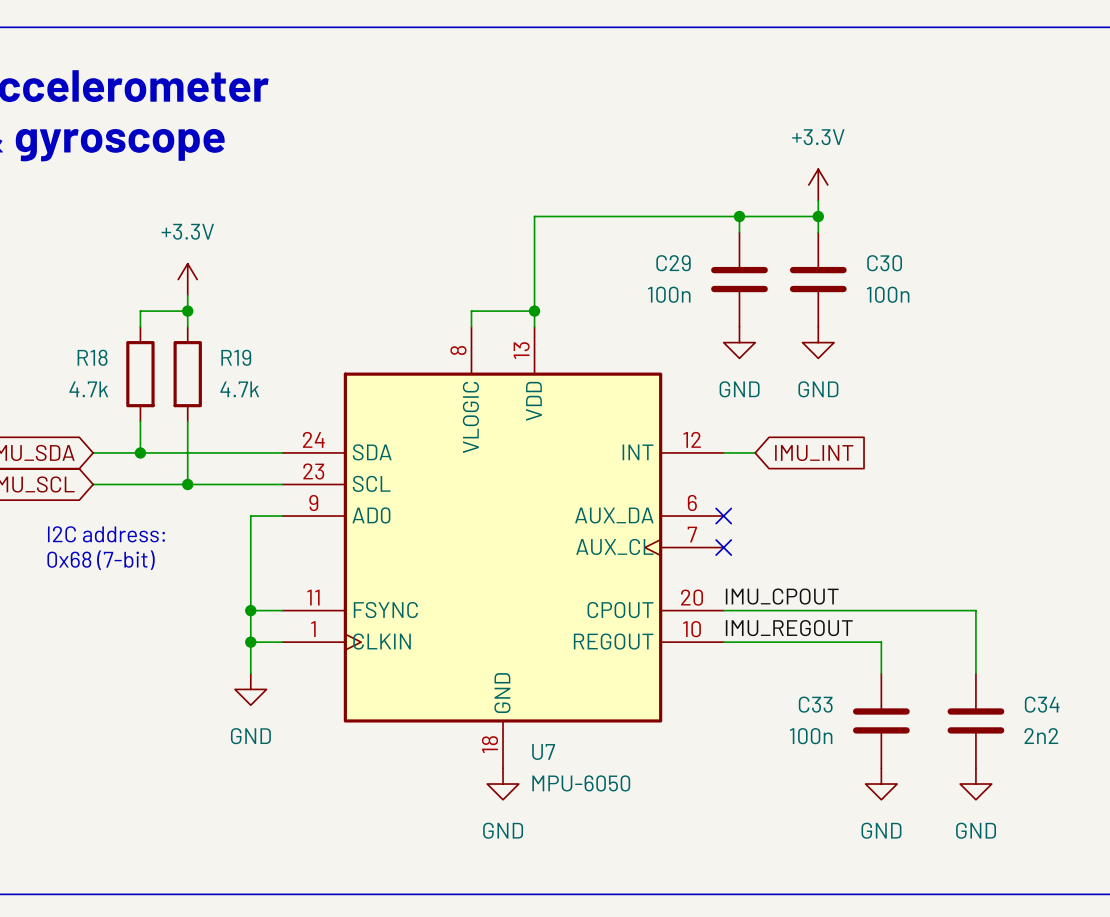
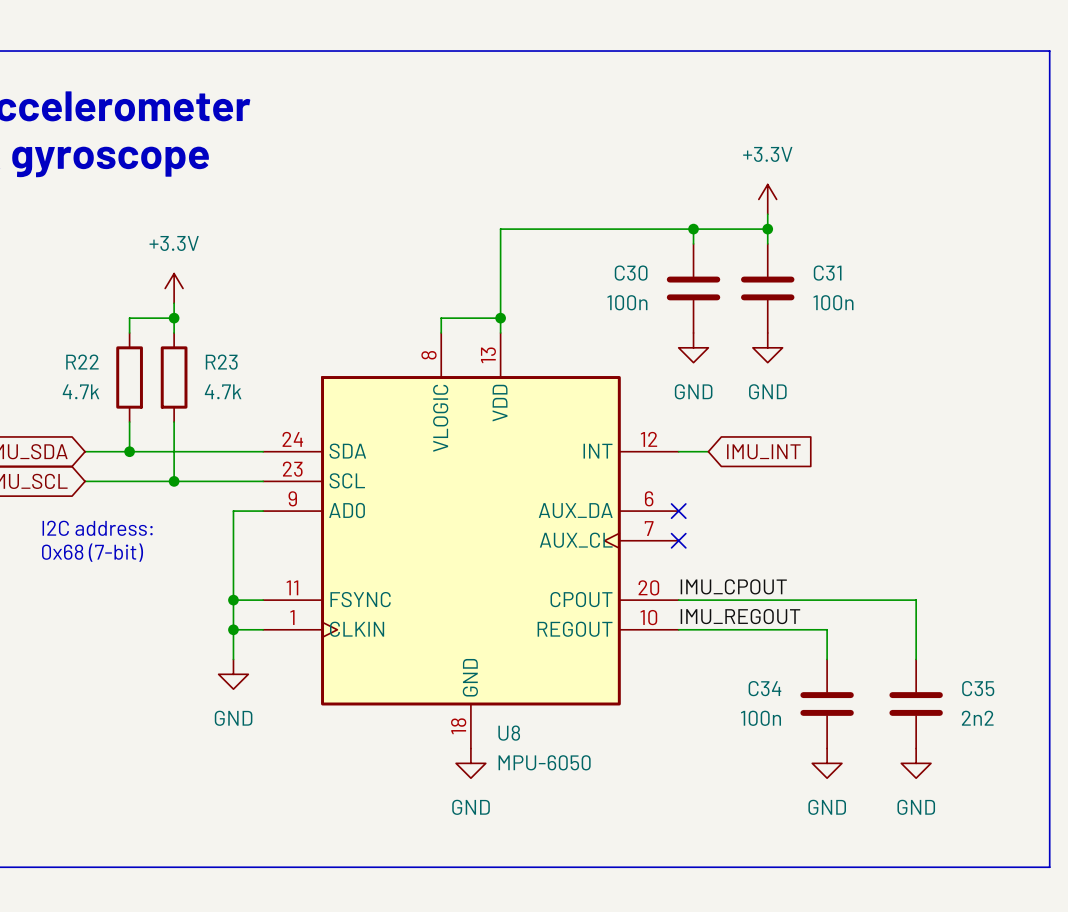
C29 name: C29 (673, 263) -> C30 (631, 273)
C30 name: C30 (884, 263) -> C31 (827, 273)
R18 name: R18 (92, 357) -> R22 (82, 362)
R19 name: R19 (236, 357) -> R23 (221, 362)
C33 name: C33 (815, 704) -> C34 (764, 688)
C34 name: C34 (1042, 704) -> C35 (978, 688)
U7 name: U7 (543, 751) -> U8 (509, 733)

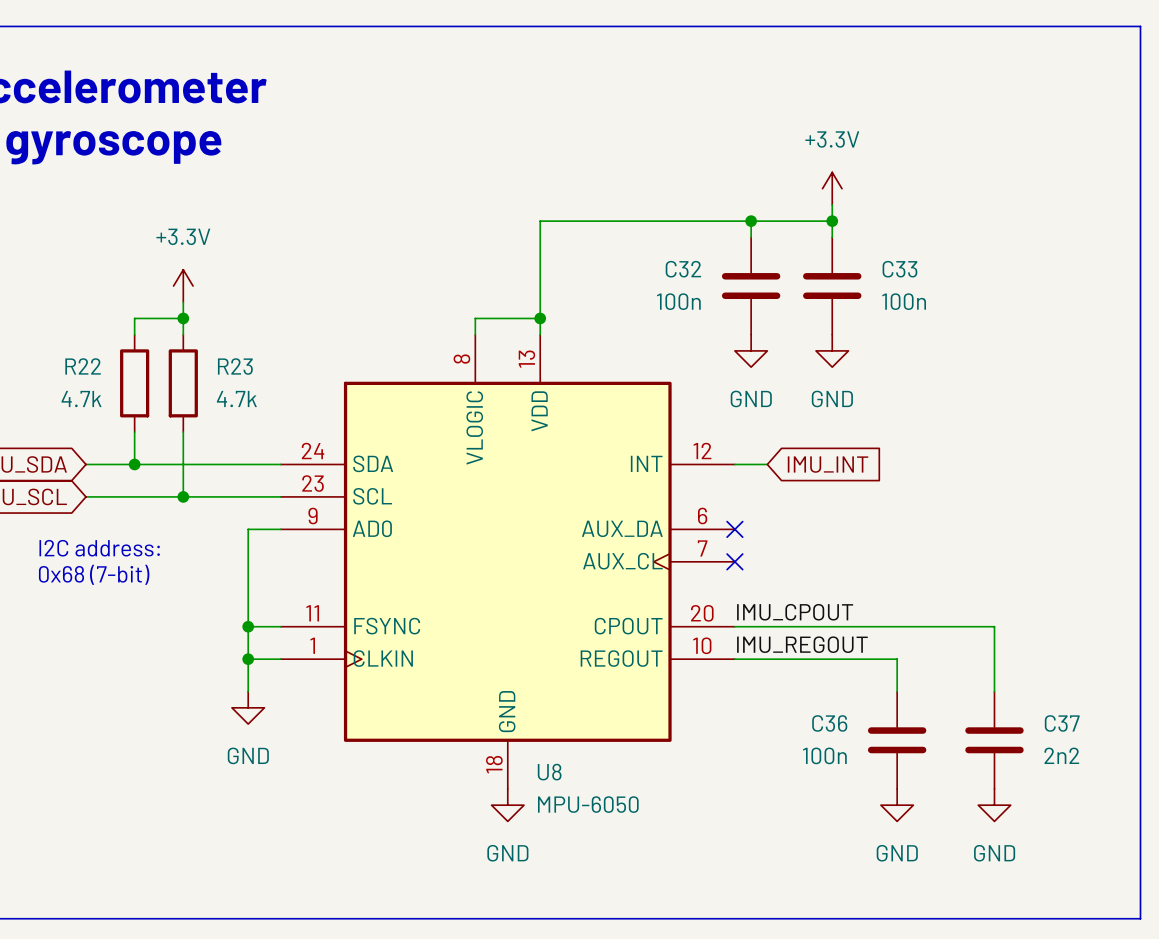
C30 name: C30 (631, 273) -> C32 (683, 269)
C31 name: C31 (827, 273) -> C33 (899, 269)
C34 name: C34 (764, 688) -> C36 (829, 723)
C35 name: C35 (978, 688) -> C37 (1062, 723)

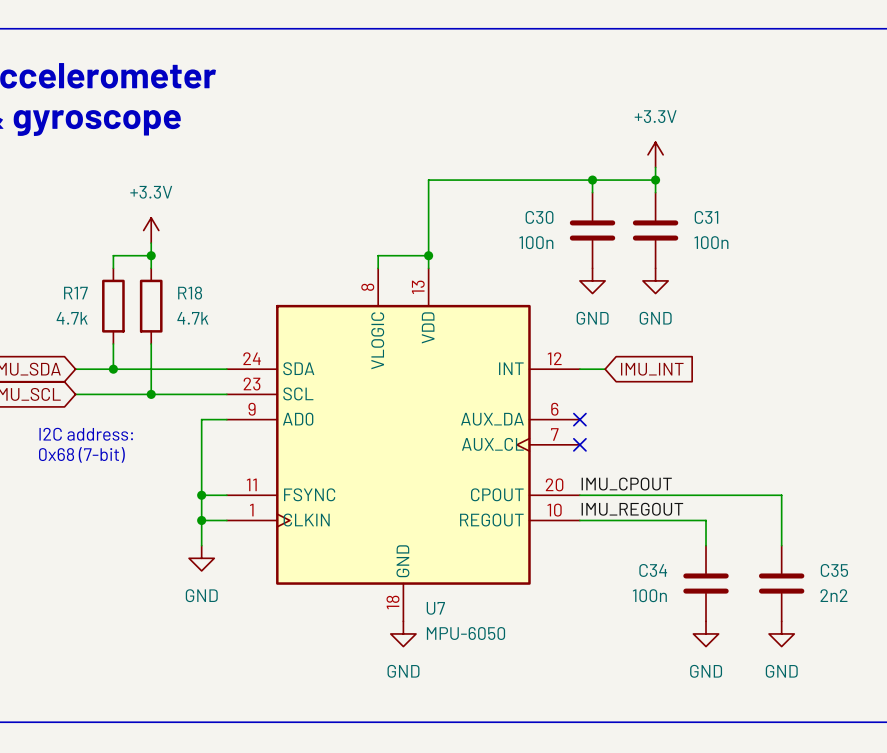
C32 name: C32 (683, 269) -> C30 (539, 217)
C33 name: C33 (899, 269) -> C31 (706, 217)
R22 name: R22 (83, 366) -> R17 (75, 293)
R23 name: R23 (235, 366) -> R18 (190, 293)
C36 name: C36 (829, 723) -> C34 (653, 570)
C37 name: C37 (1062, 723) -> C35 (834, 570)
U8 name: U8 (549, 772) -> U7 (435, 608)

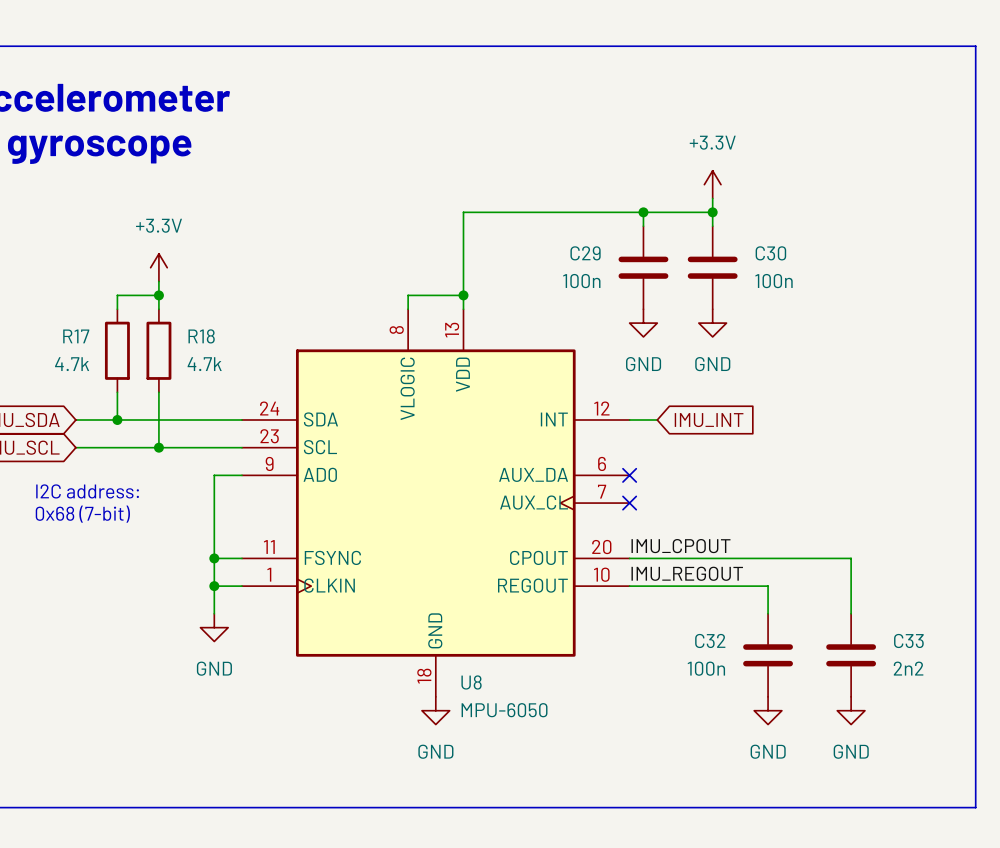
C30 name: C30 (539, 217) -> C29 (585, 253)
C31 name: C31 (706, 217) -> C30 (770, 253)
C34 name: C34 (653, 570) -> C32 (710, 640)
C35 name: C35 (834, 570) -> C33 (908, 640)
U7 name: U7 (435, 608) -> U8 (471, 682)

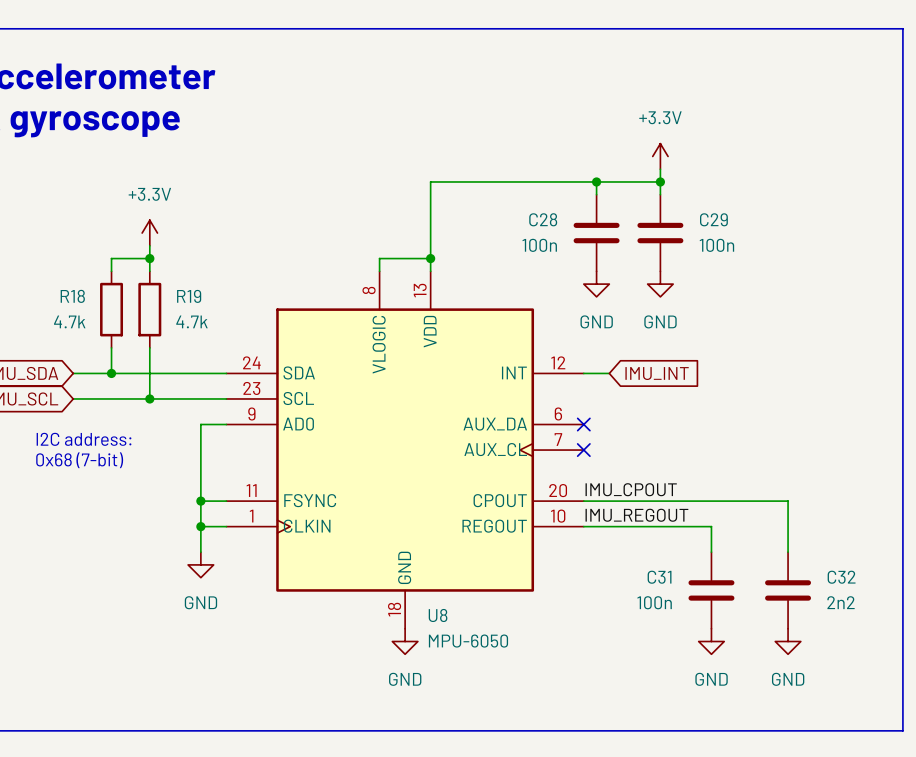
C29 name: C29 (585, 253) -> C28 (543, 219)
C30 name: C30 (770, 253) -> C29 (713, 219)
R17 name: R17 (76, 336) -> R18 (72, 296)
R18 name: R18 (201, 336) -> R19 (189, 296)
C32 name: C32 (710, 640) -> C31 (659, 577)
C33 name: C33 (908, 640) -> C32 (841, 577)

